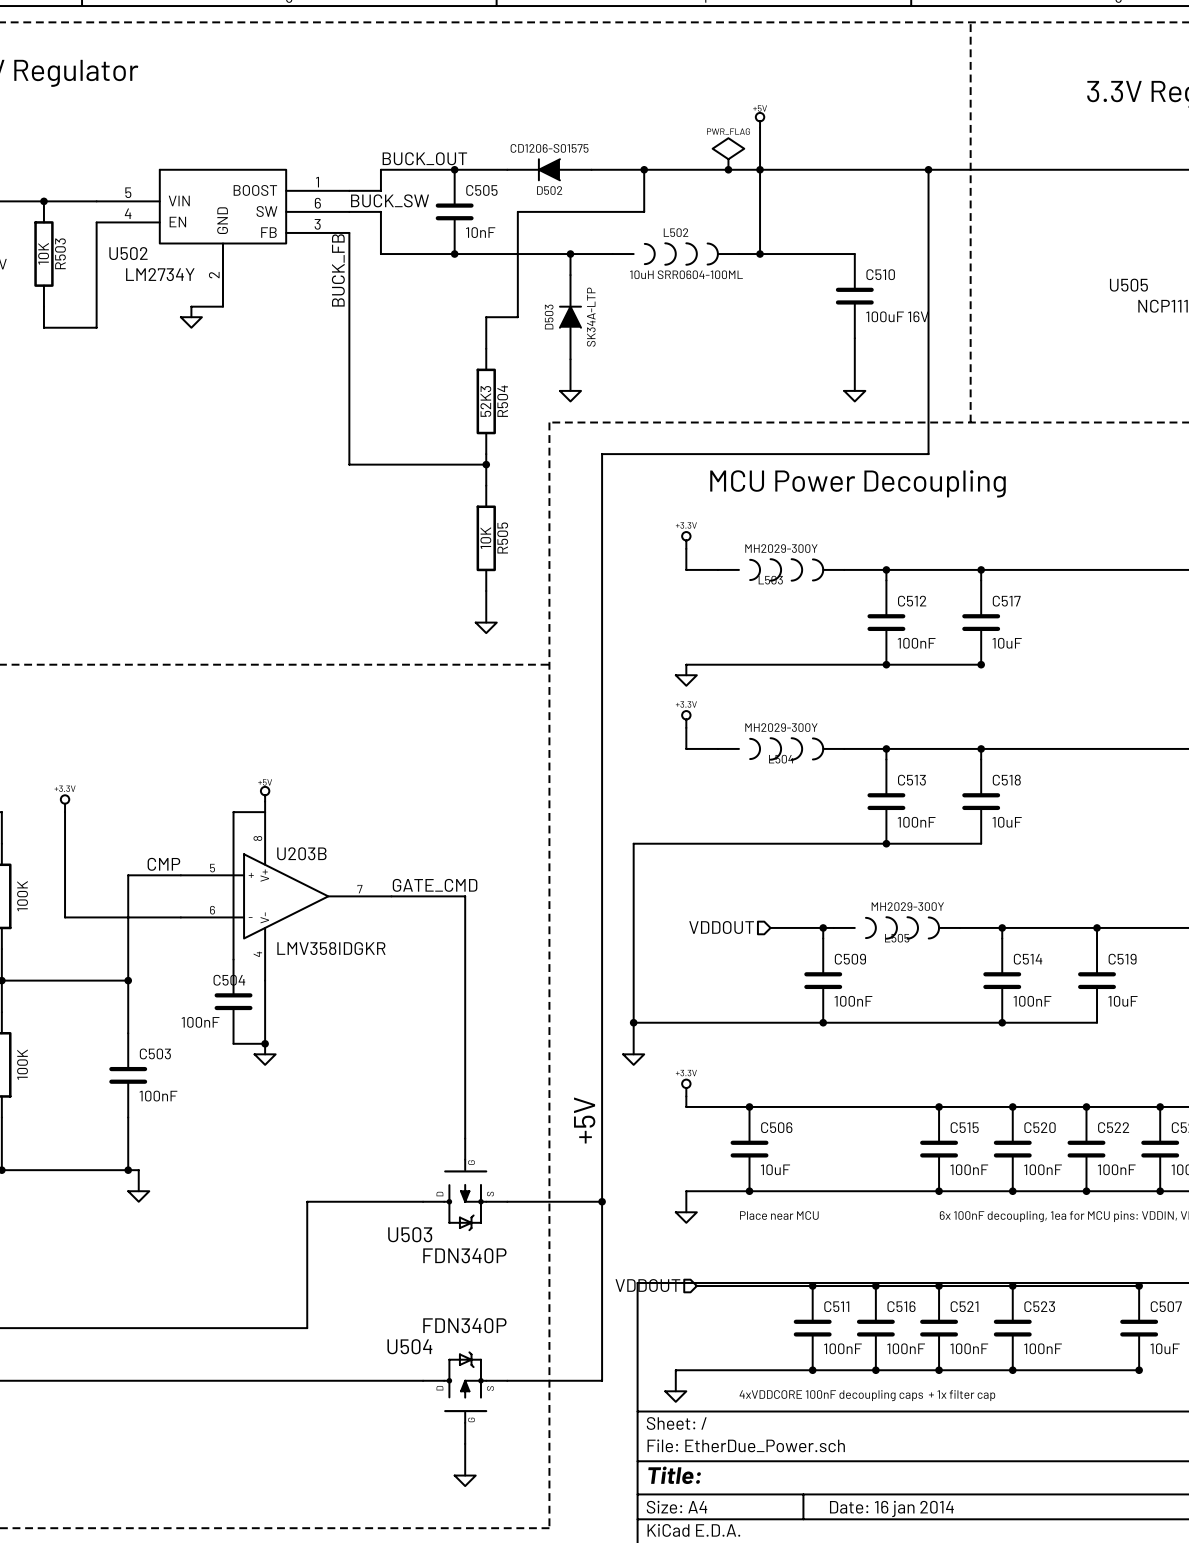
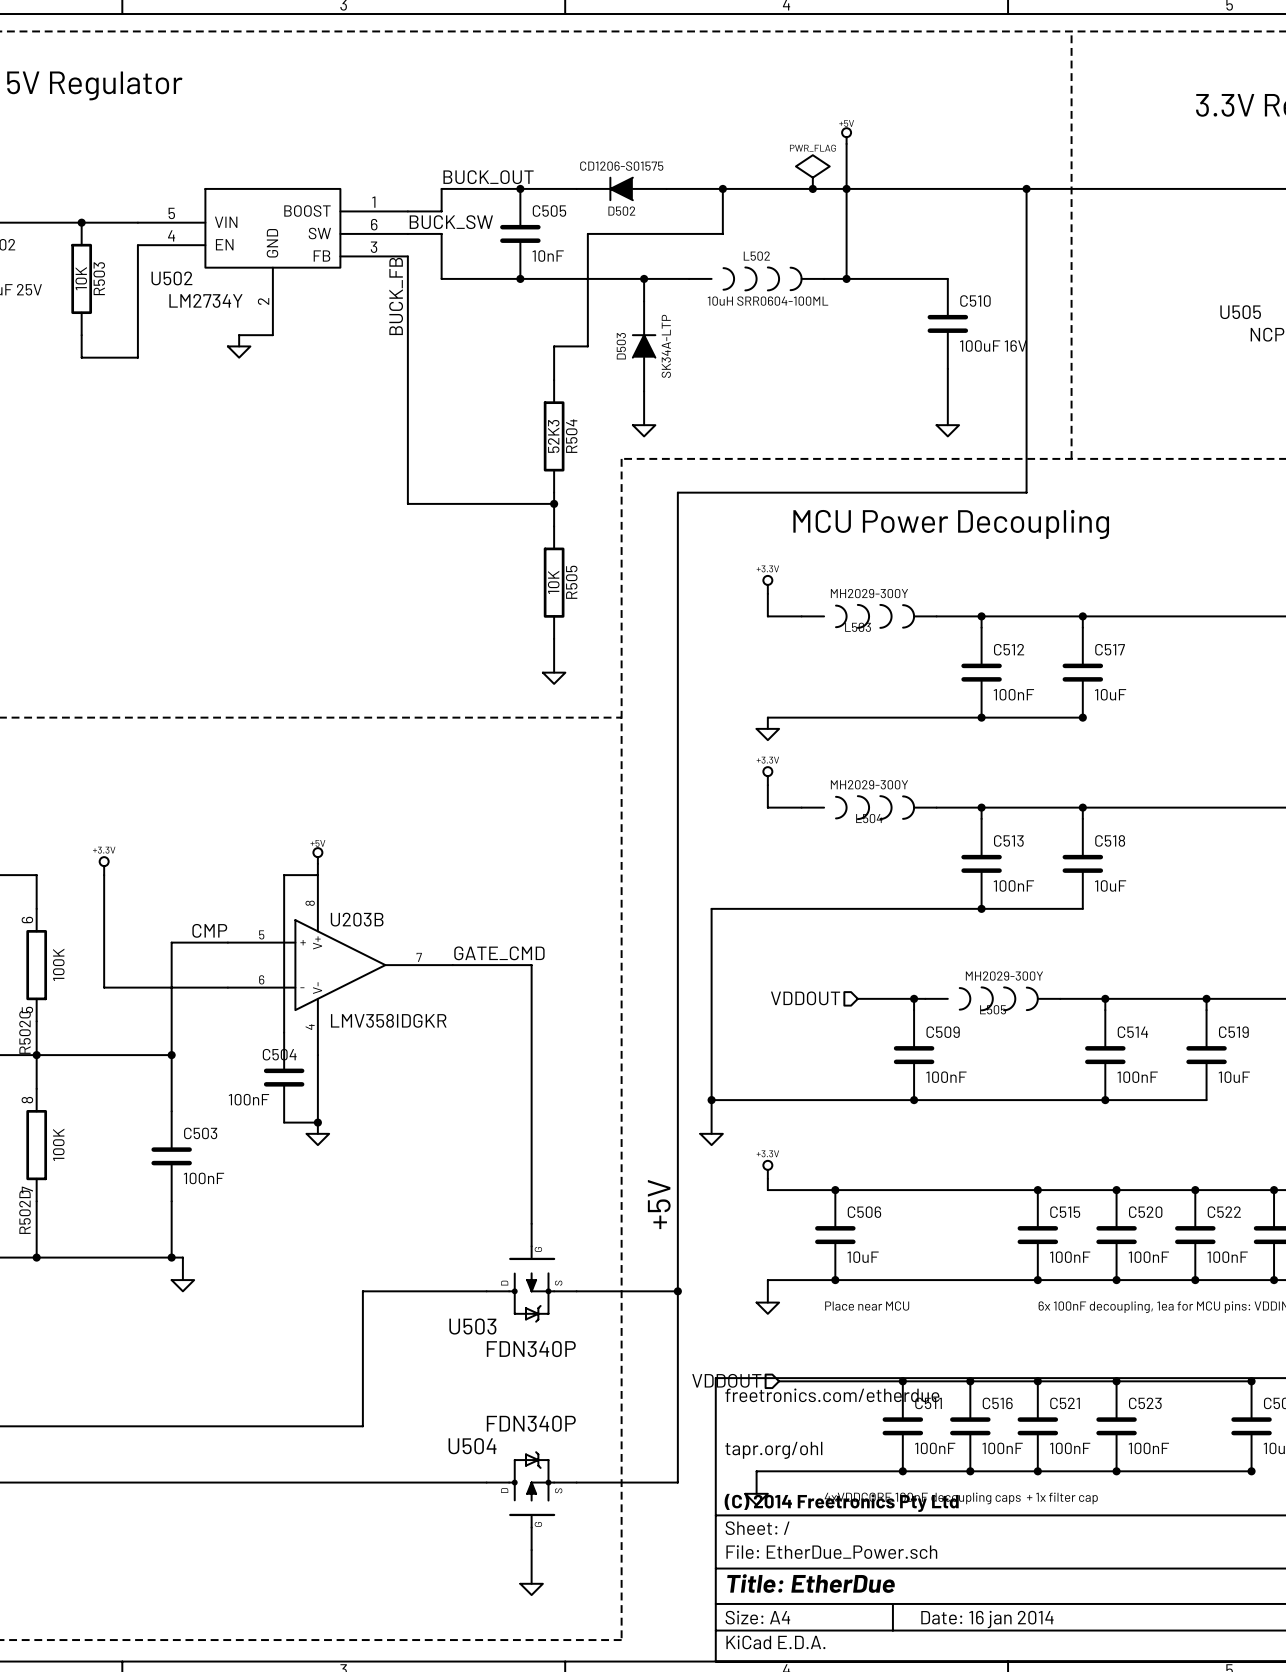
title block: none -> freetronics.com/etherdue (832, 1395)
title block: none -> tapr.org/ohl (773, 1450)
title block: none -> (C) 2014 Freetronics Pty Ltd (841, 1502)
title block: Title: (674, 1475) -> Title: EtherDue (811, 1583)

